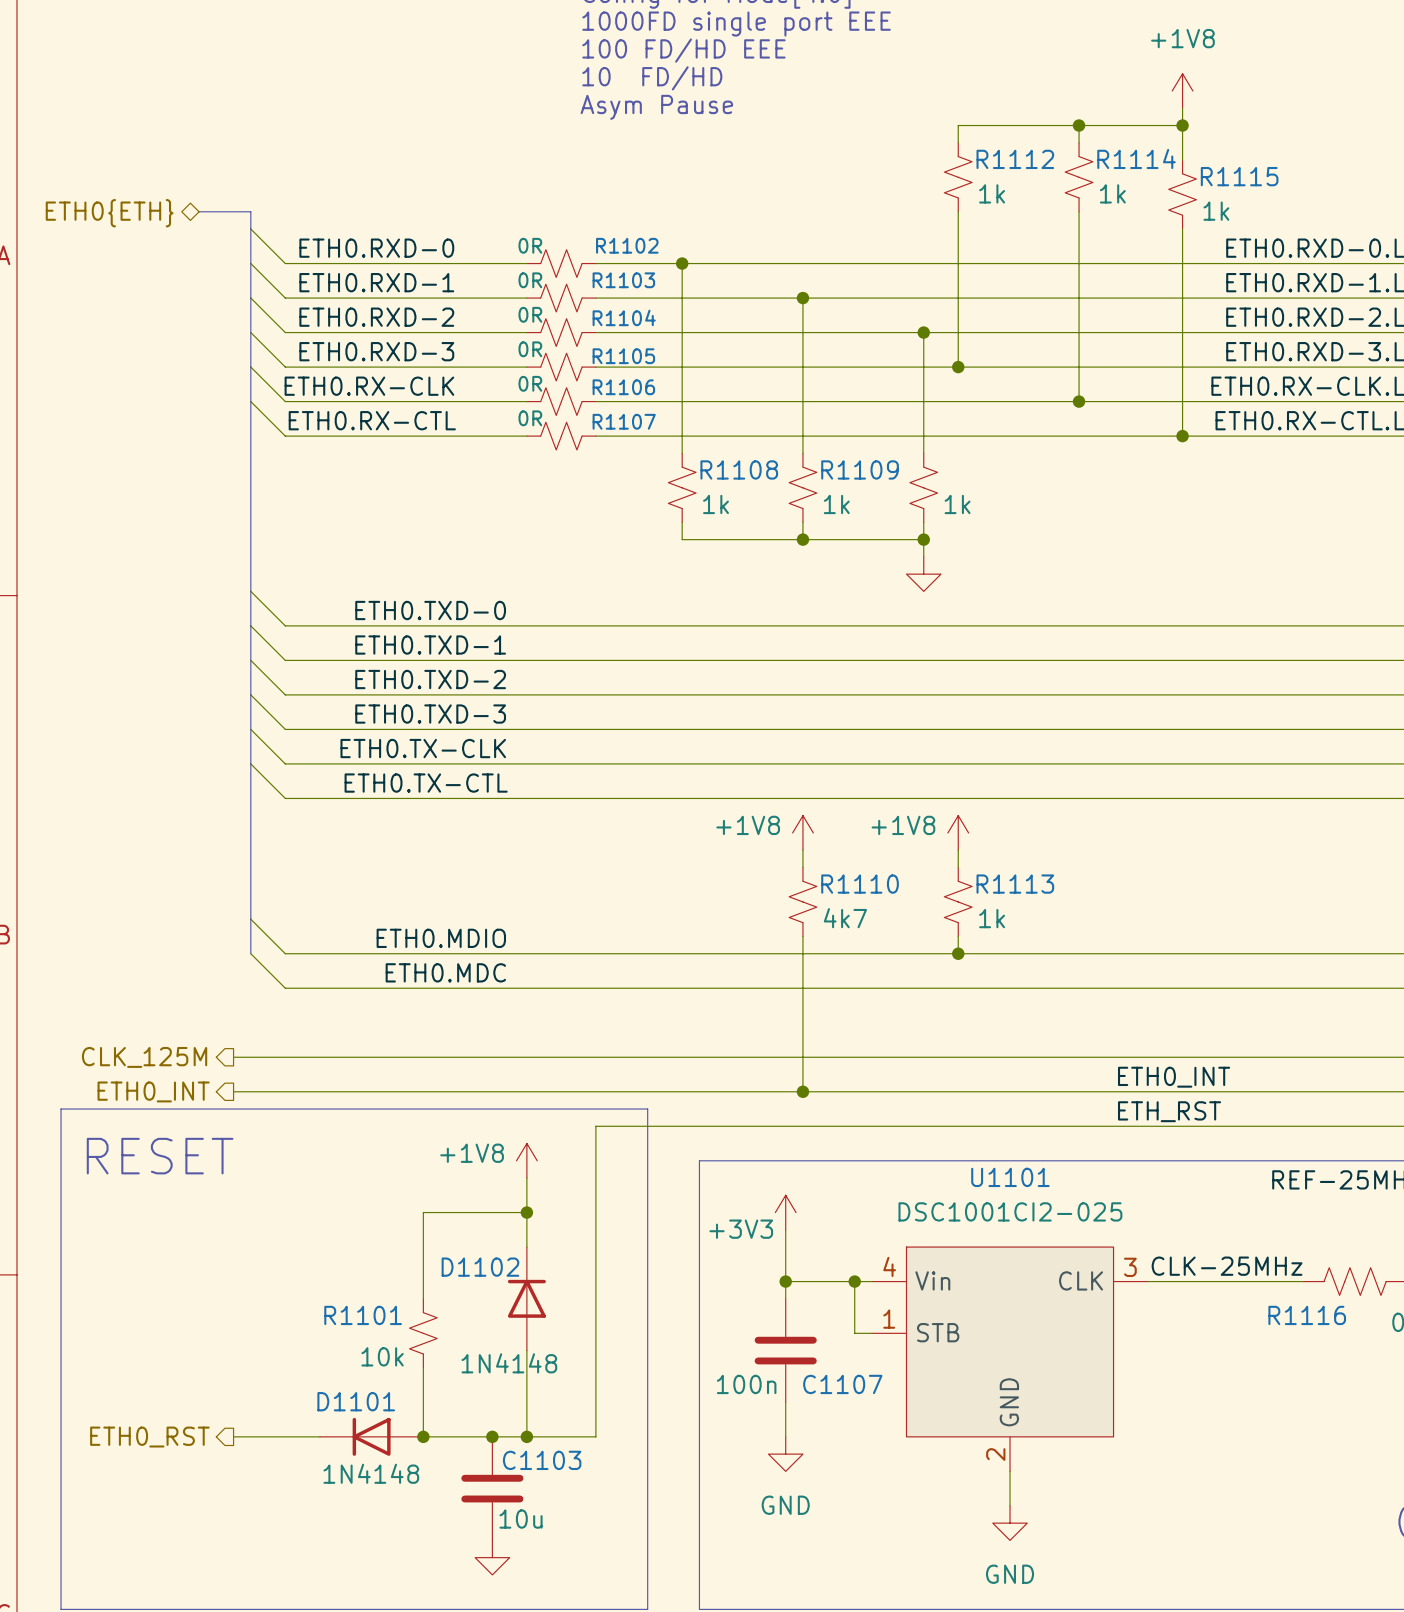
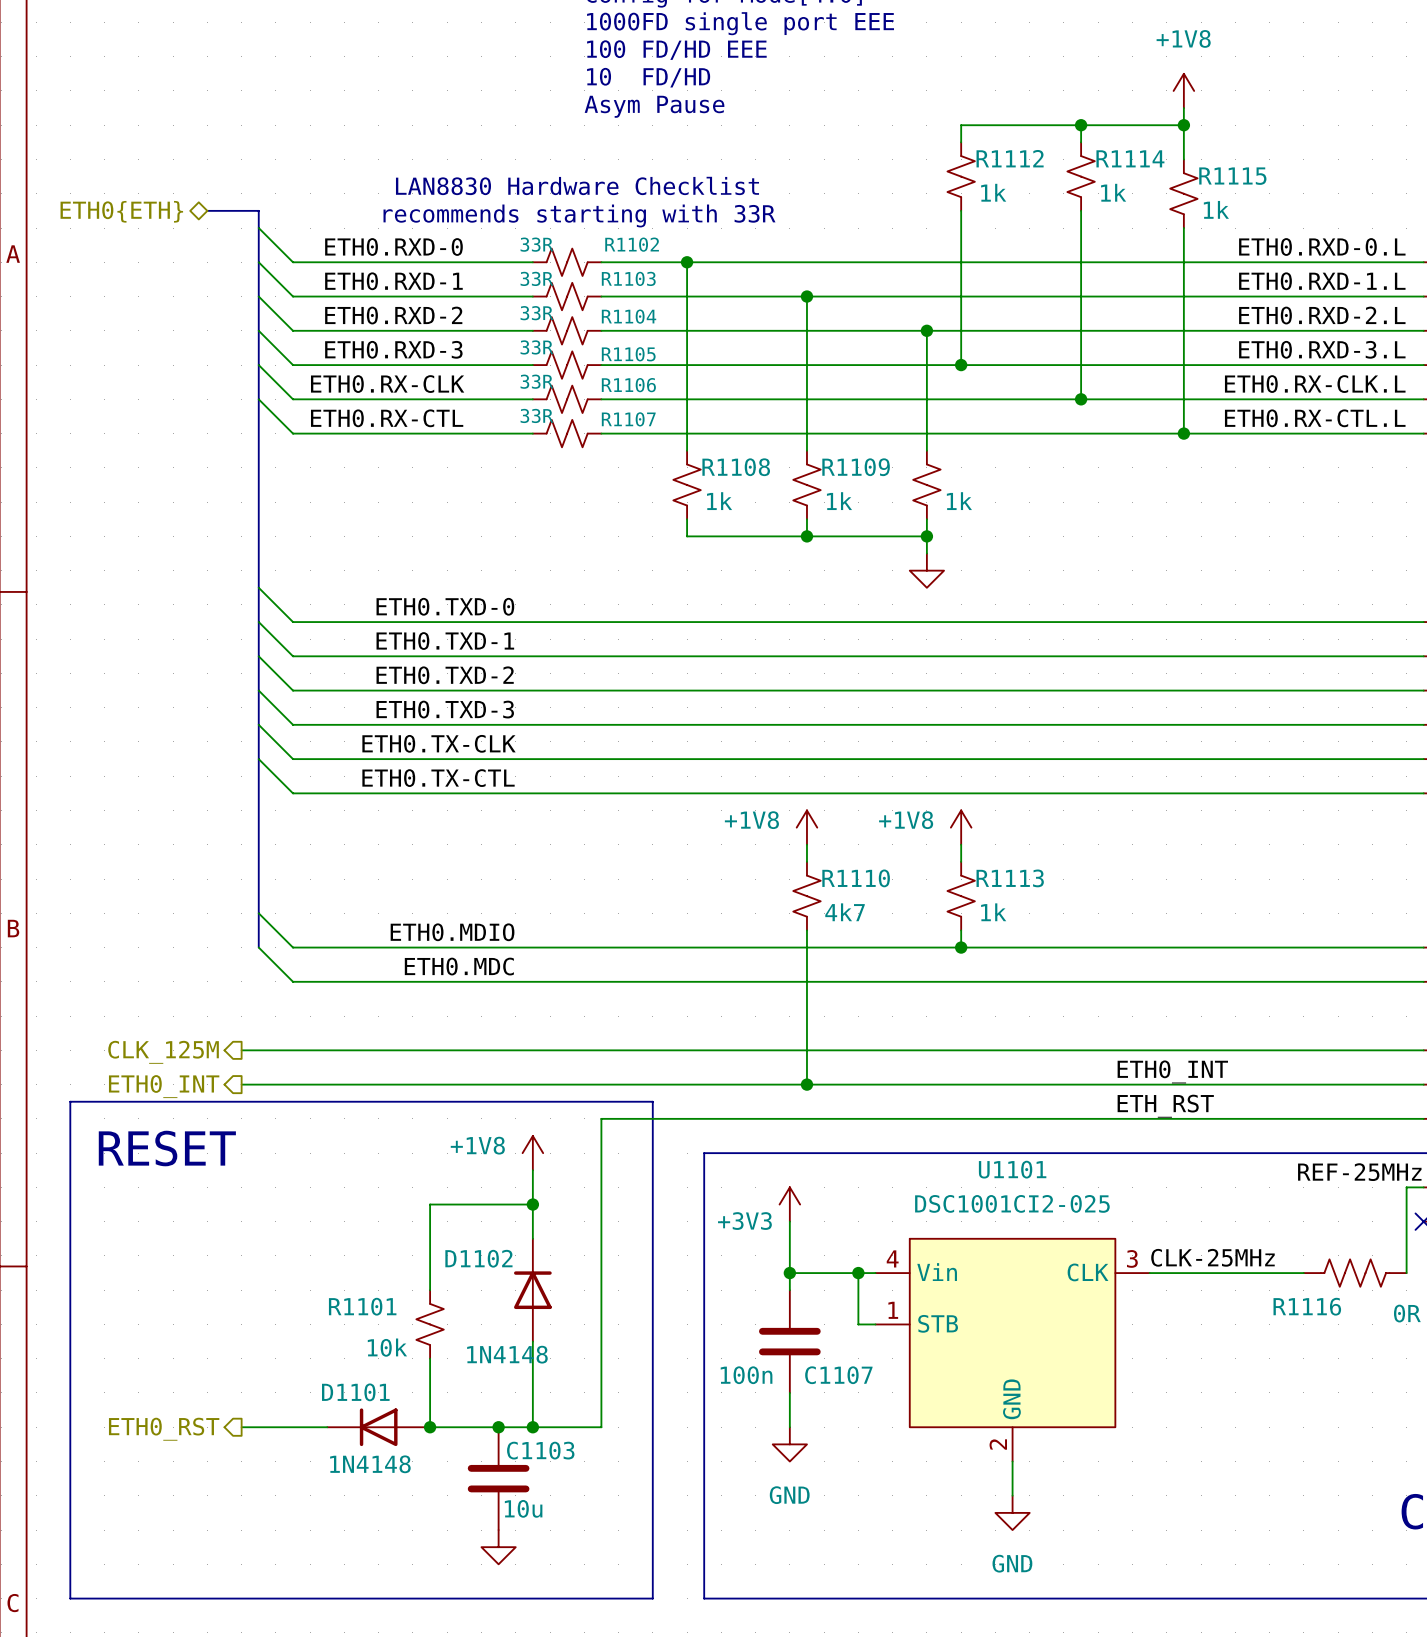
text: none -> LAN8830 Hardware Checklist (577, 185)
text: none -> recommends starting with 33R (579, 215)
R1102 value: 0R (530, 245) -> 33R (536, 244)
R1103 value: 0R (530, 280) -> 33R (536, 278)
R1104 value: 0R (530, 314) -> 33R (536, 313)
R1105 value: 0R (530, 349) -> 33R (536, 347)
R1106 value: 0R (530, 383) -> 33R (536, 381)
R1107 value: 0R (530, 418) -> 33R (536, 415)

